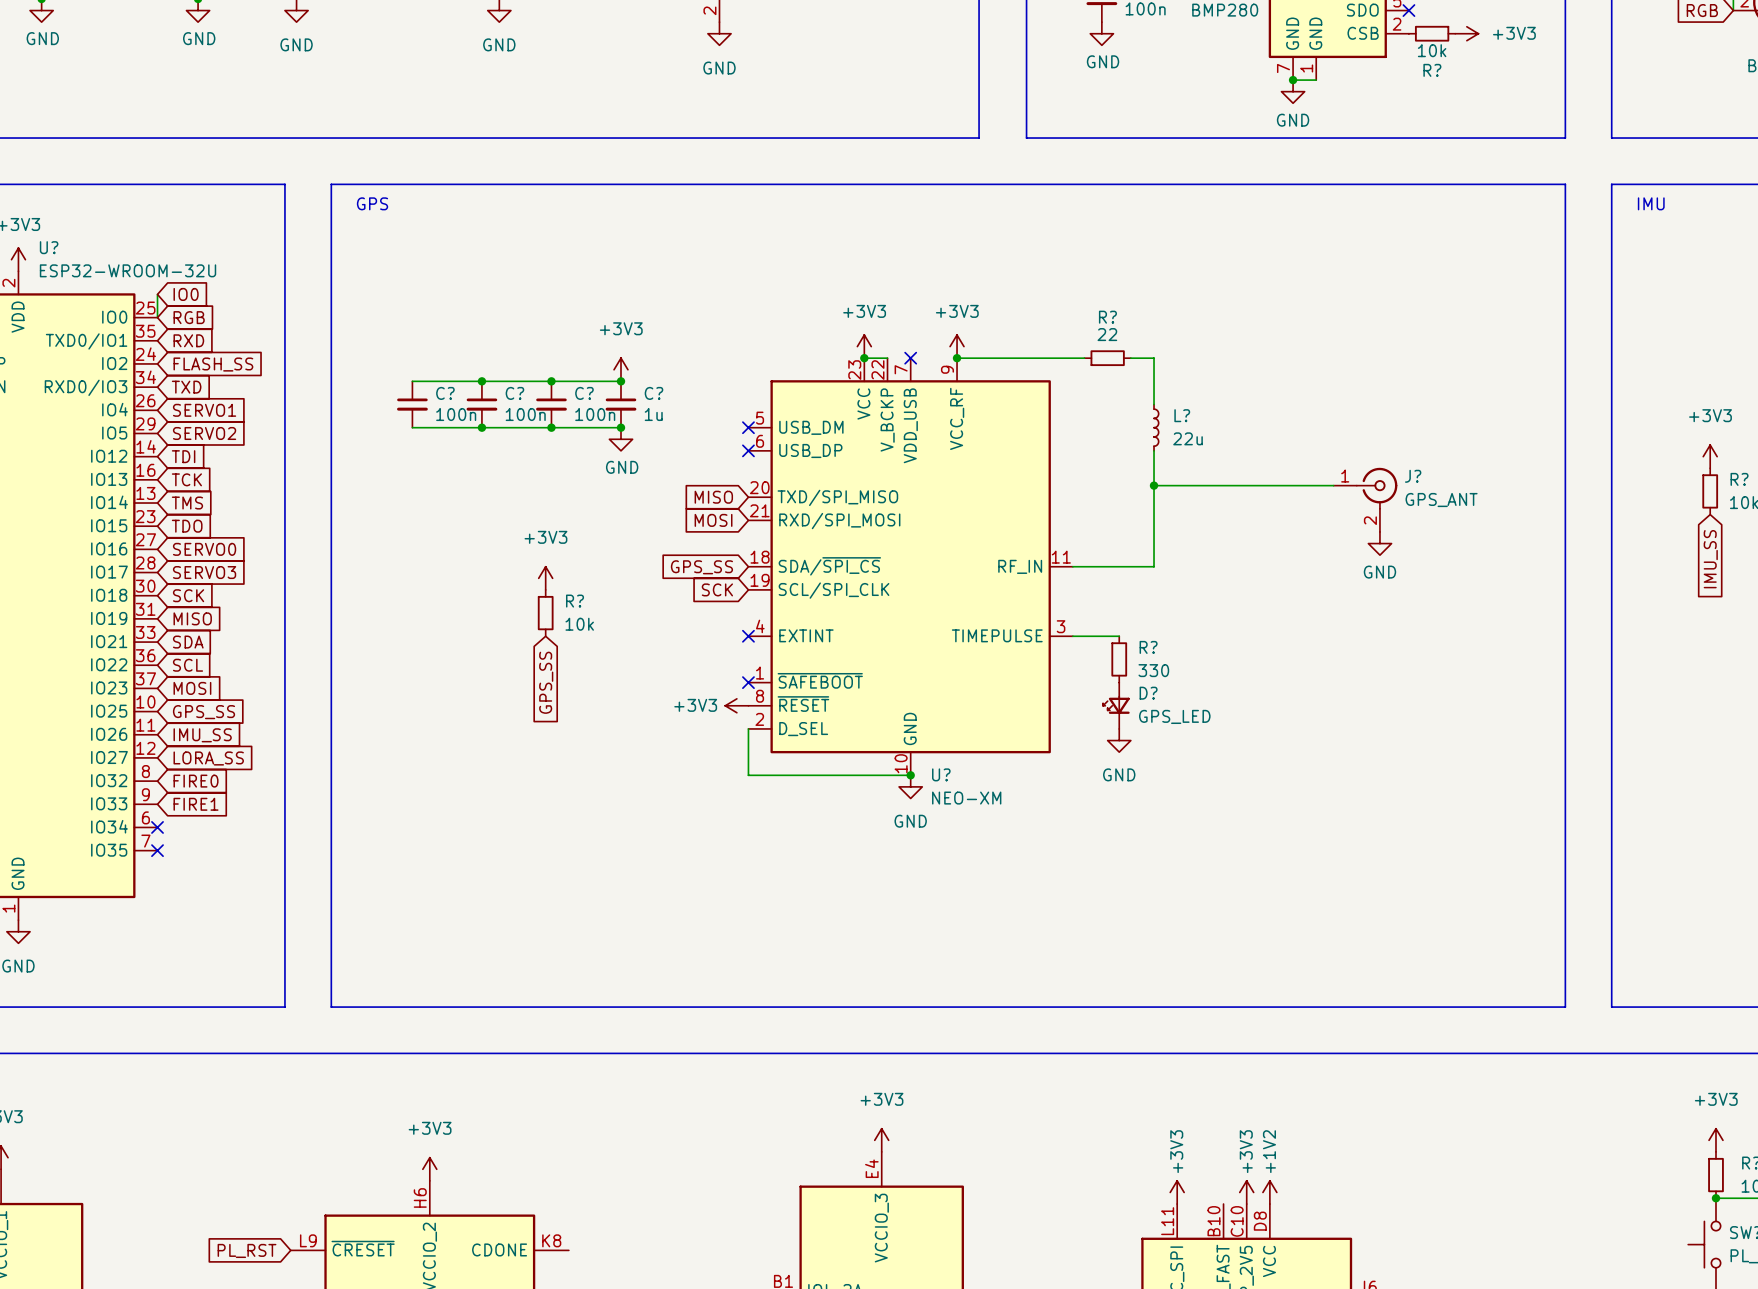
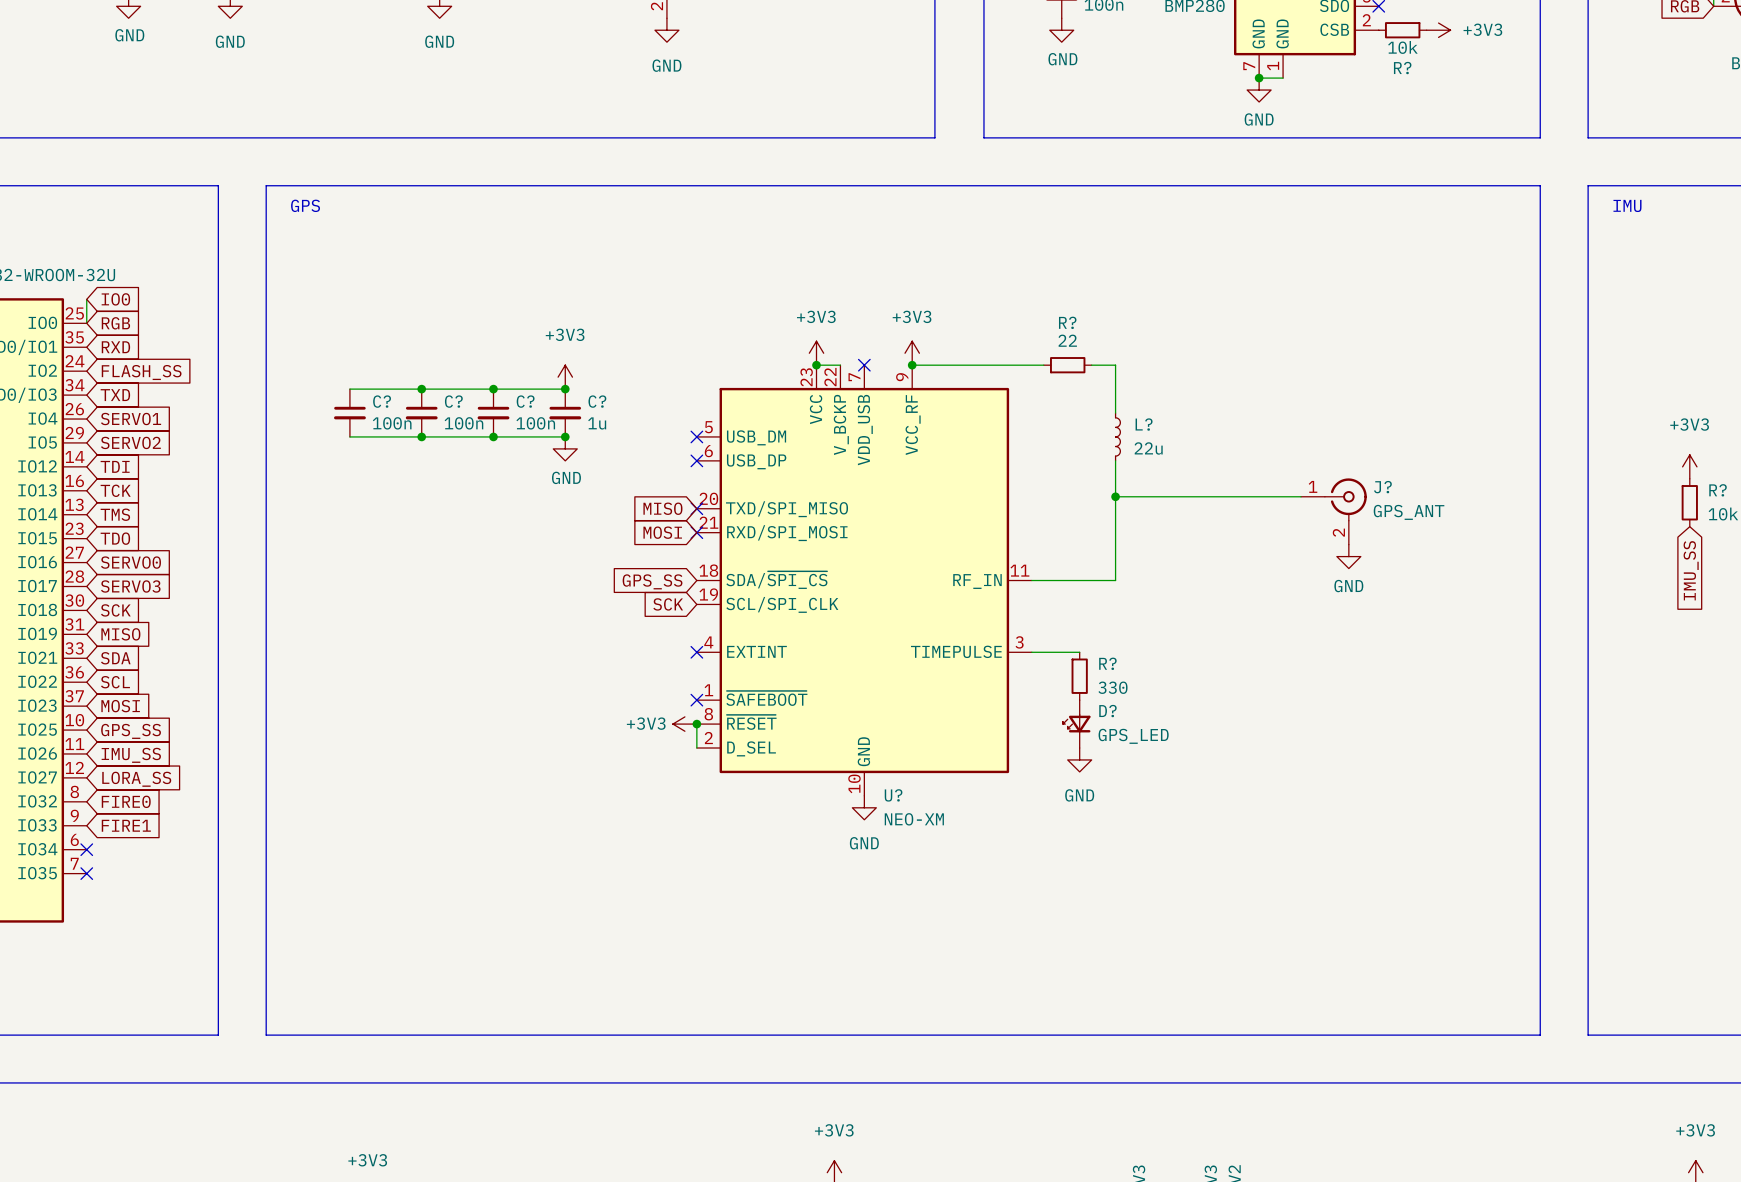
no-connect mark: none -> (696, 508)
no-connect mark: none -> (696, 532)
power symbol: +3V3 (545, 578) -> none
R?: 10k (545, 613) -> none
global label: GPS_SS (546, 682) -> none
junction: none -> (696, 724)
wire: (748, 728) (748, 775) (910, 775) -> (696, 748) (696, 724)
junction: (910, 775) -> none

